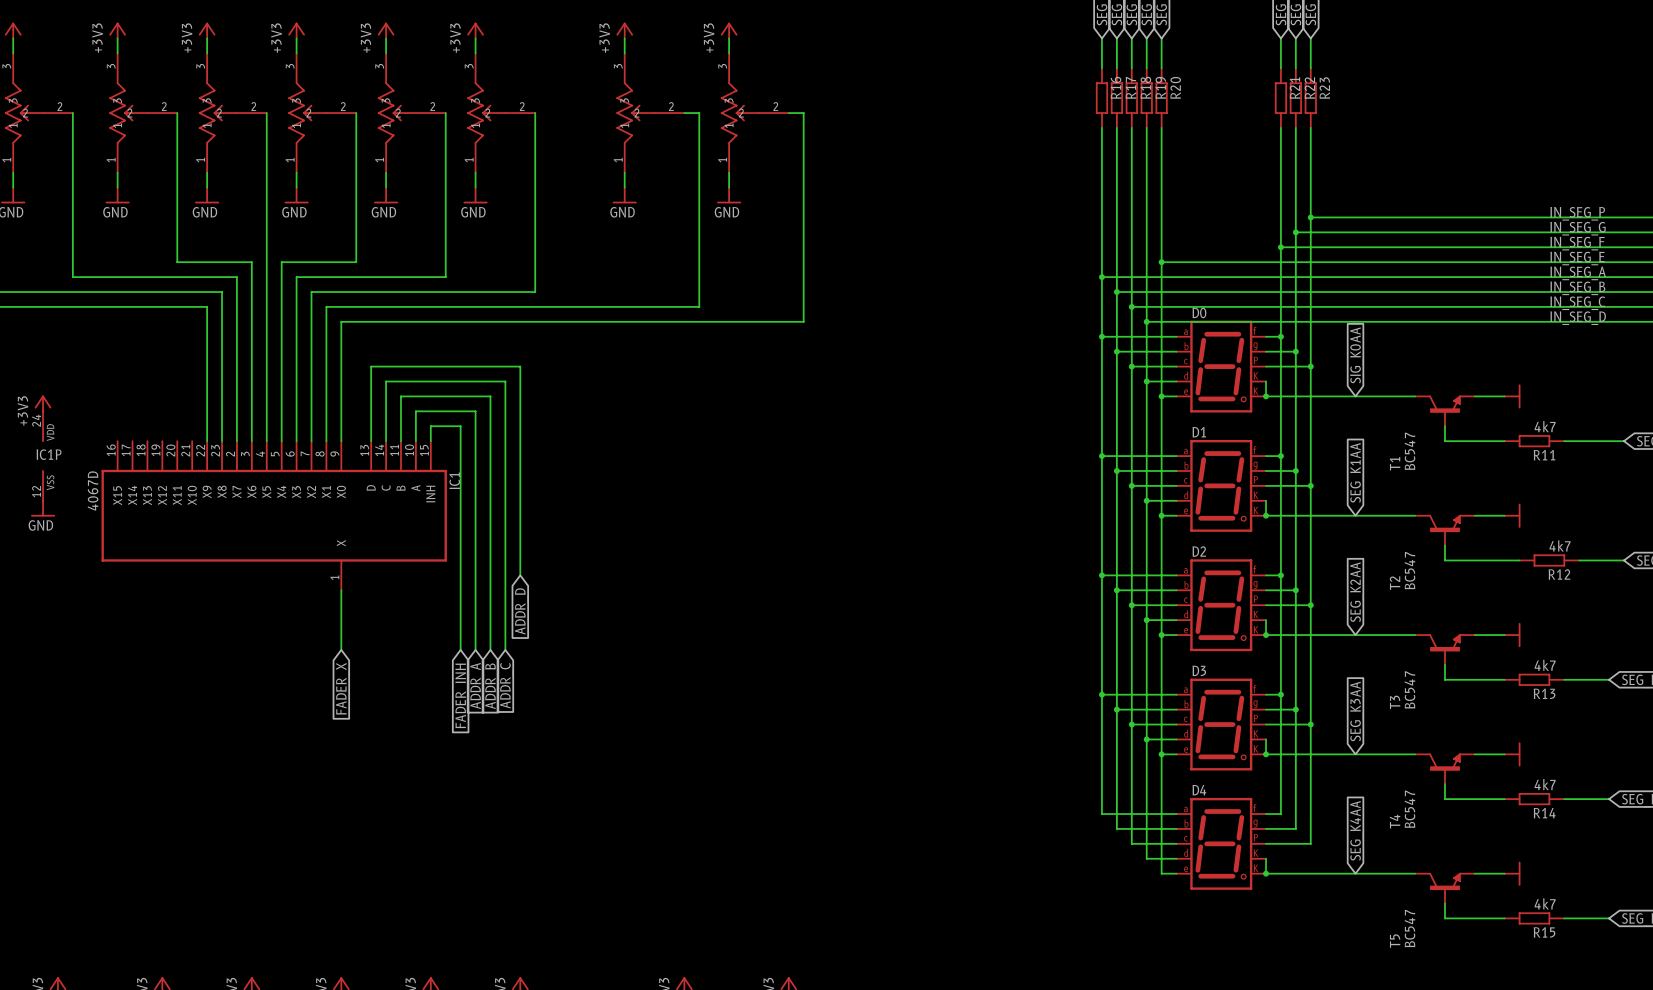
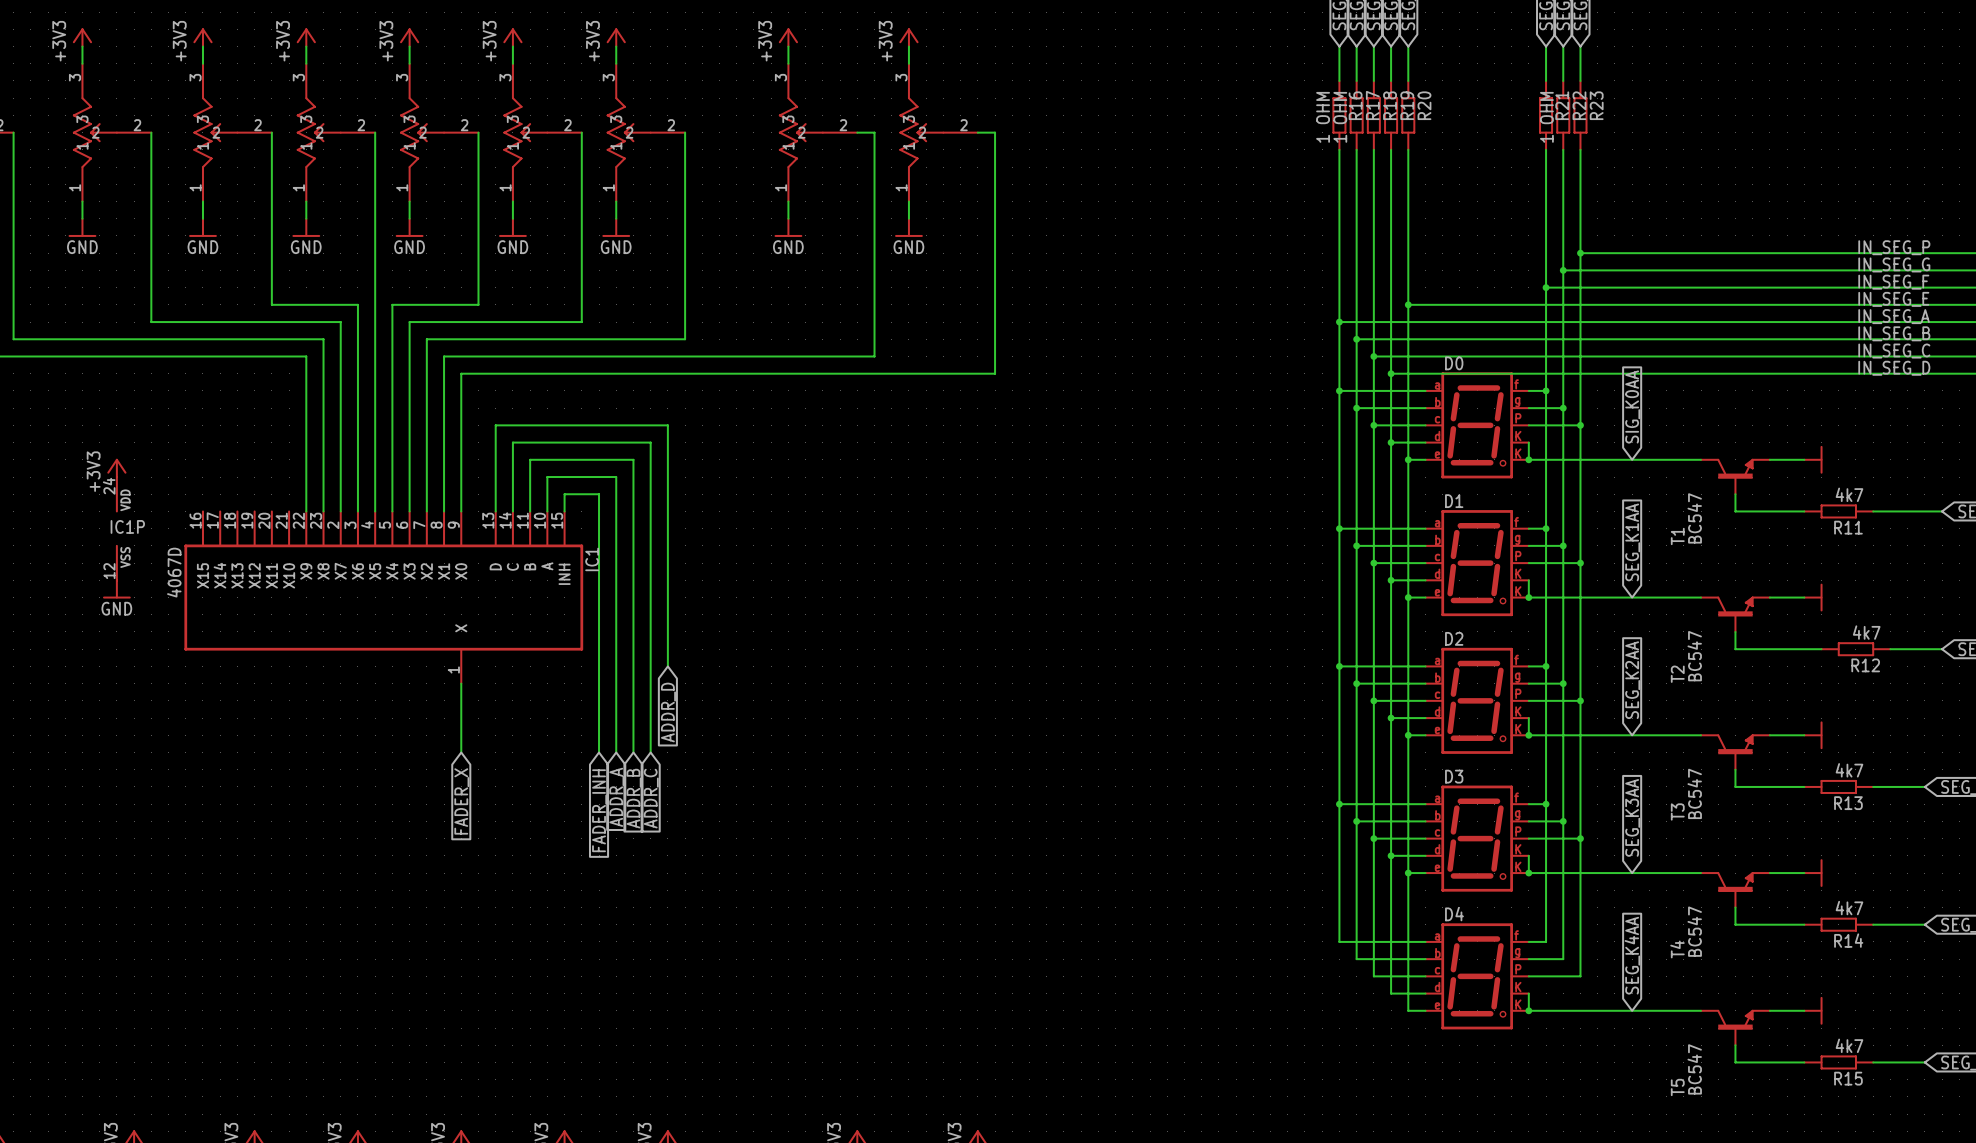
R16 value: none -> 1 OHM (1323, 117)
R17 value: none -> 1 OHM (1340, 117)
R22 value: none -> 1 OHM (1546, 117)

